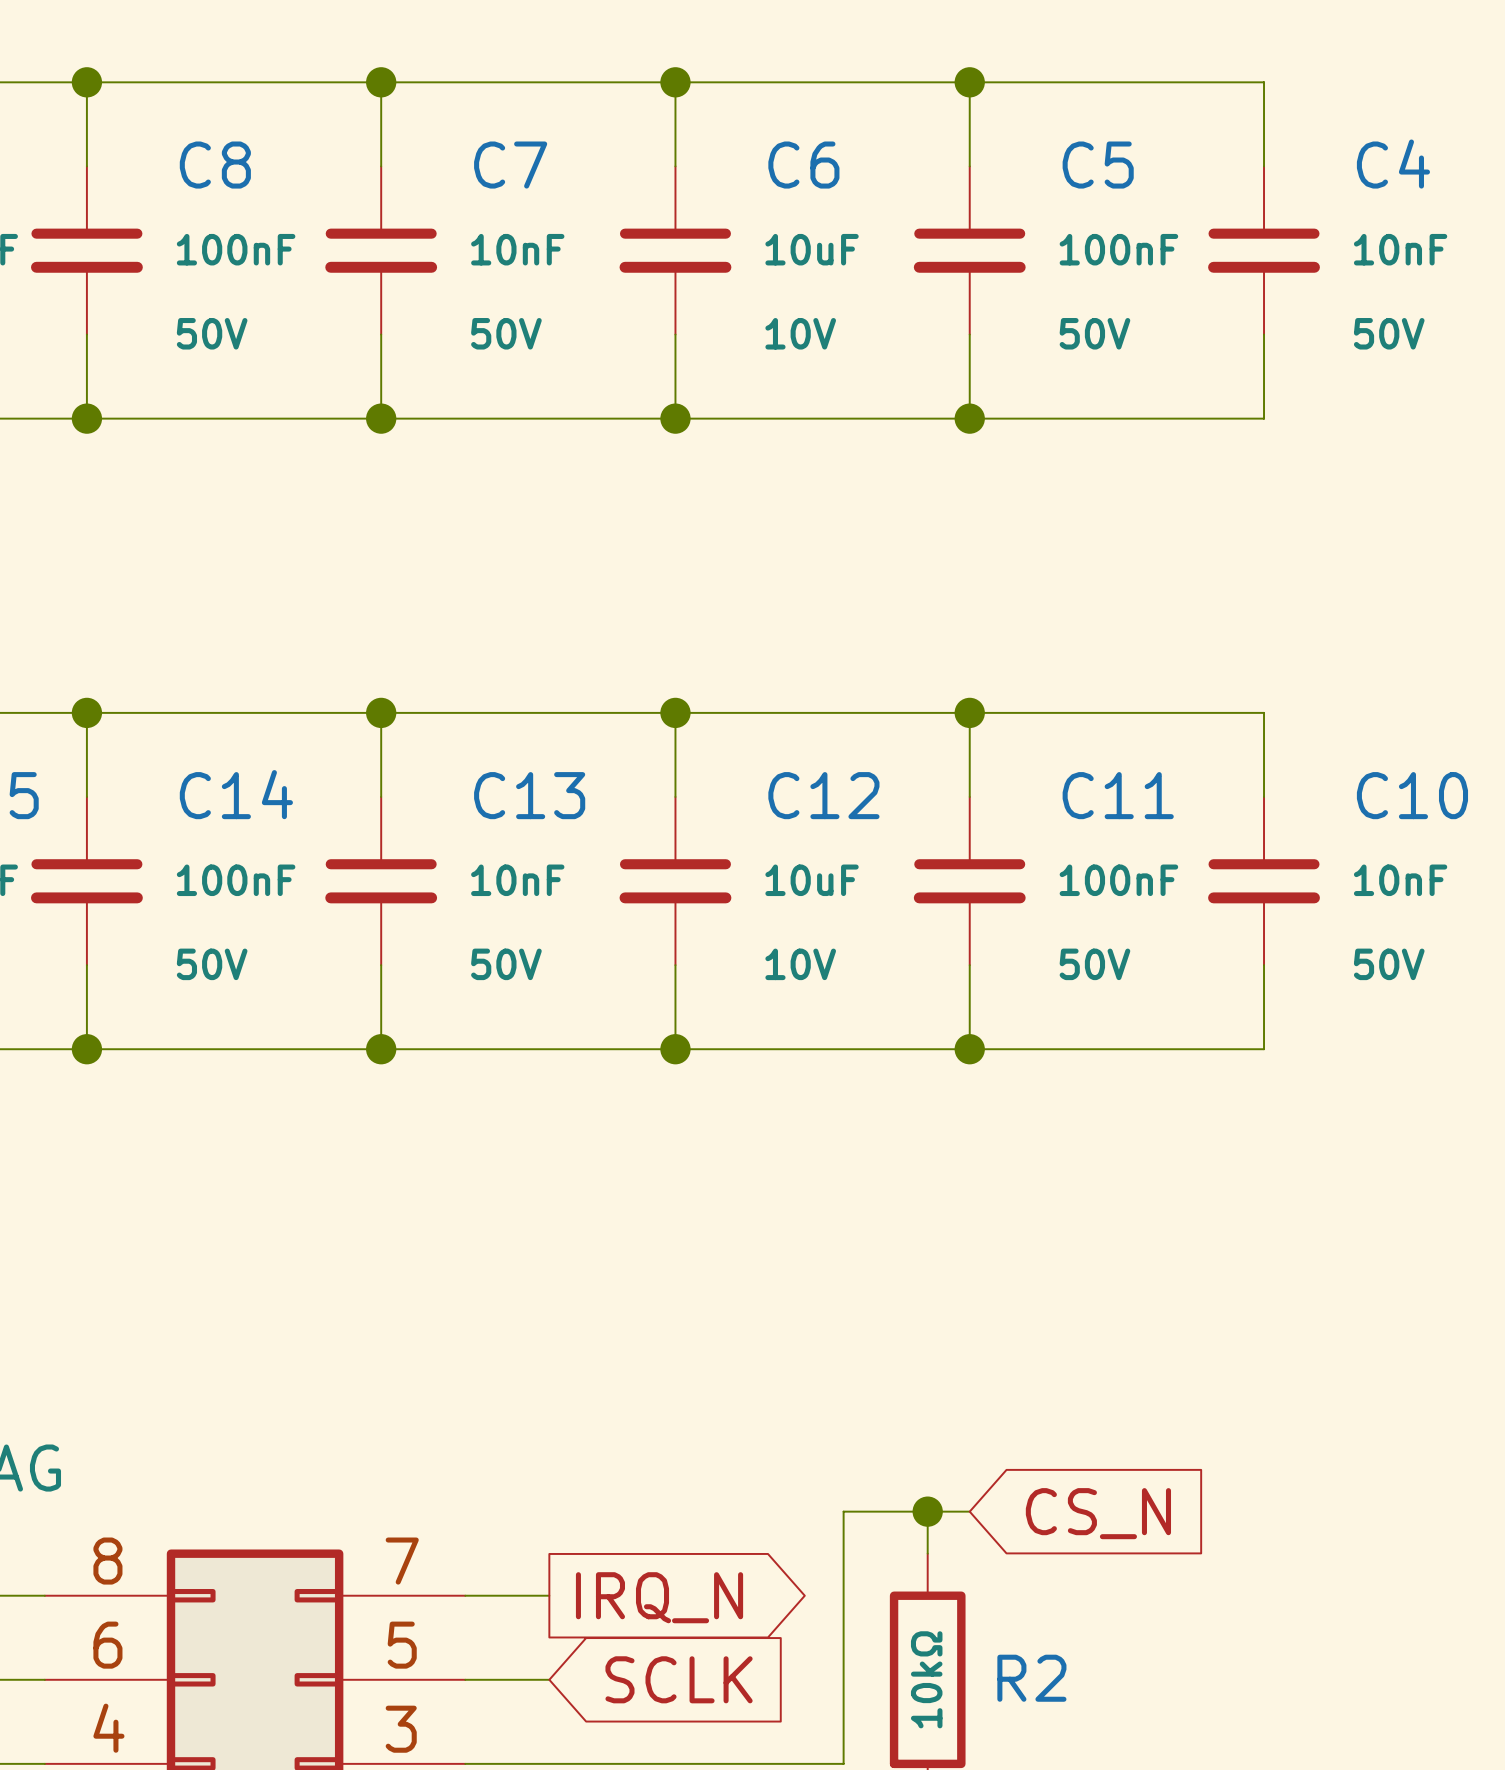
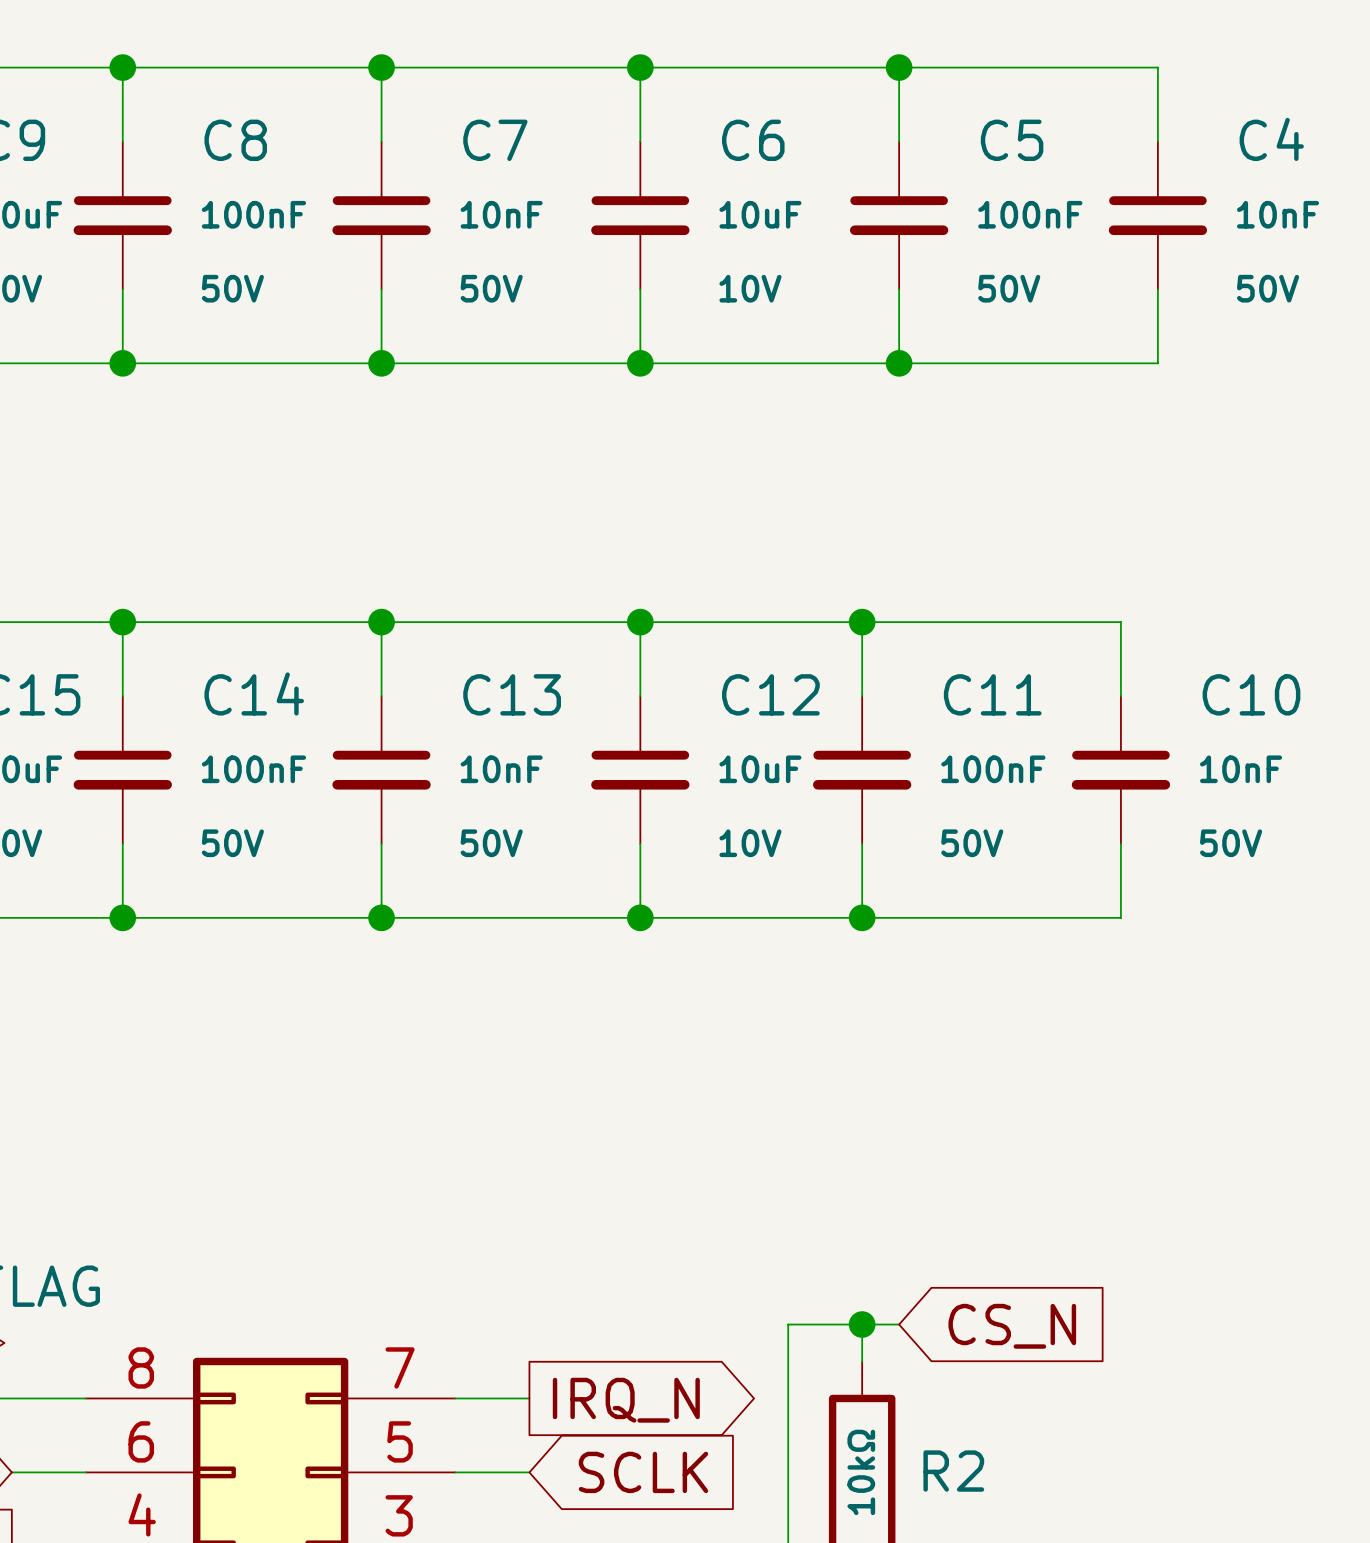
wire: (969, 712) (969, 796) -> (862, 622) (862, 696)
junction position: (969, 712) -> (862, 622)
wire: (1221, 712) (1264, 712) (1264, 796) -> (1120, 622) (1120, 696)
C11 position: (969, 881) -> (862, 769)
C10 position: (1264, 881) -> (1120, 769)
wire: (969, 965) (969, 1049) -> (862, 843) (862, 917)
wire: (1264, 965) (1264, 1049) (1221, 1049) -> (1120, 843) (1120, 917)
junction position: (969, 1049) -> (862, 917)

